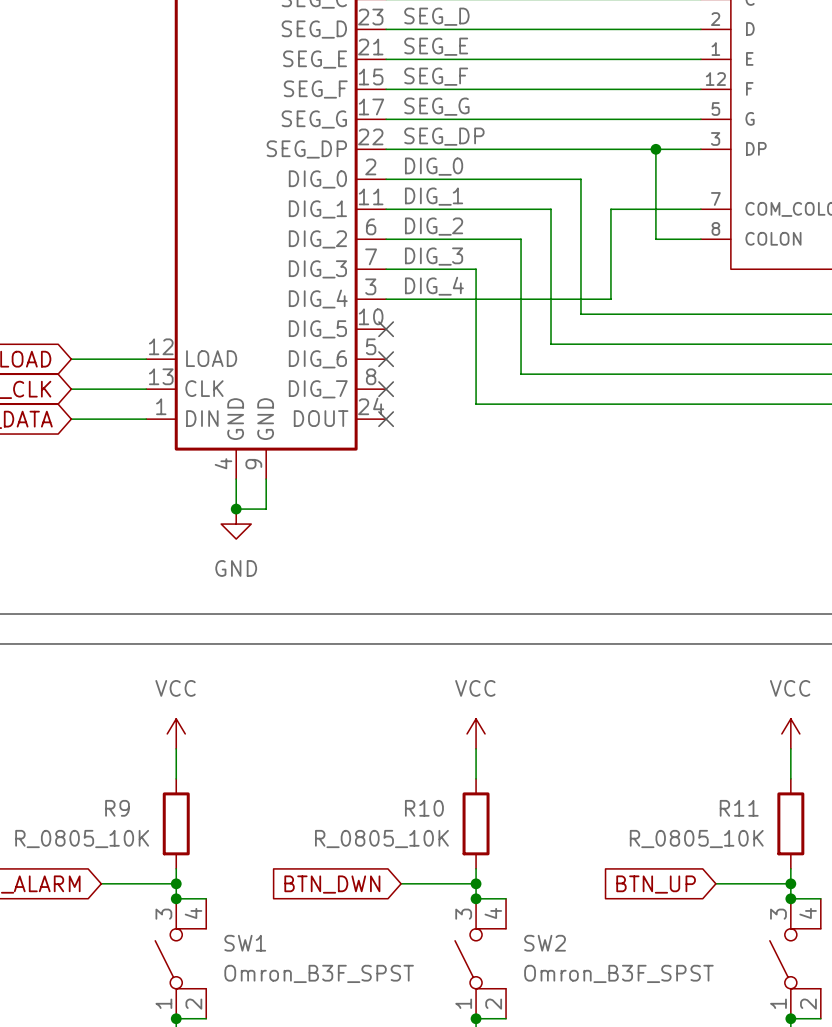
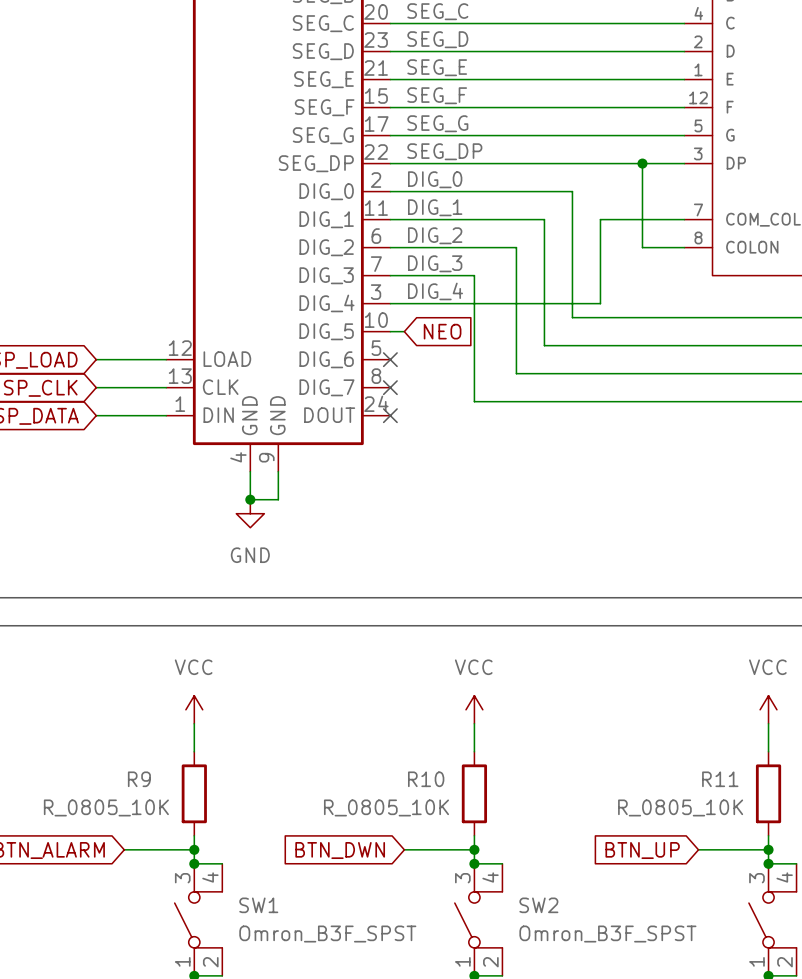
wire: none -> (390, 331) (404, 331)
no-connect mark: (386, 329) -> none
global label: none -> NEO (442, 331)

